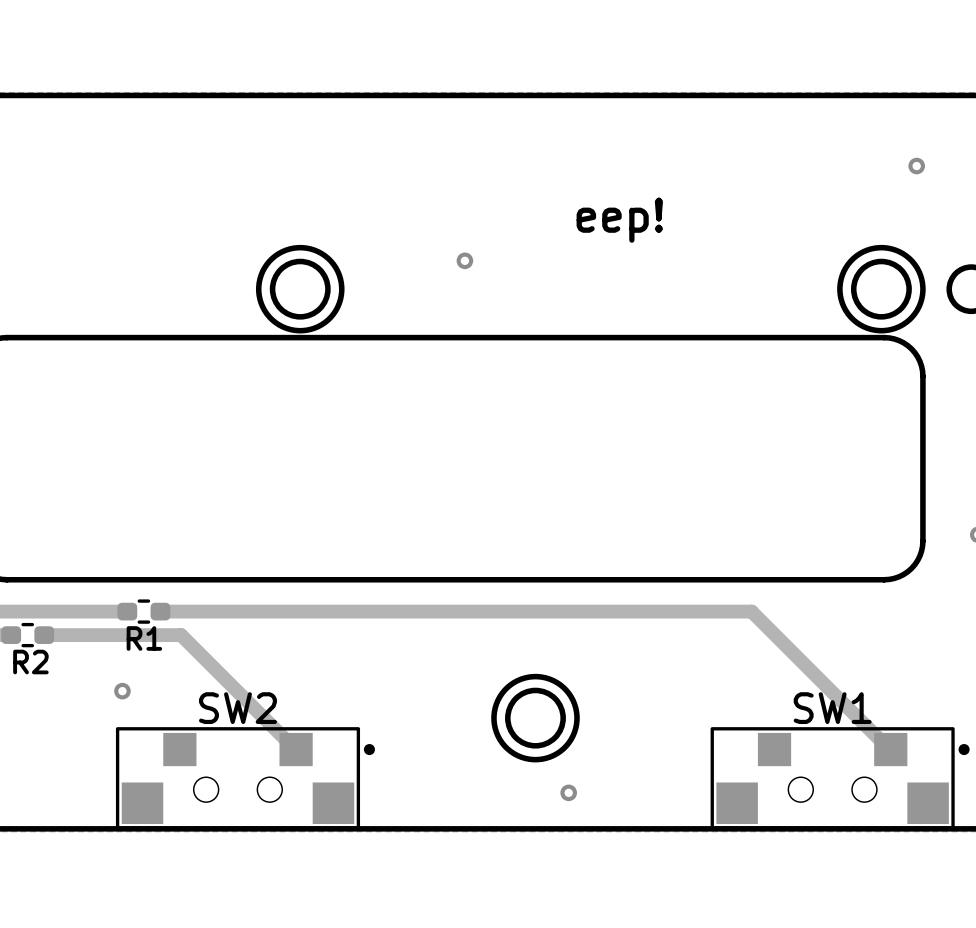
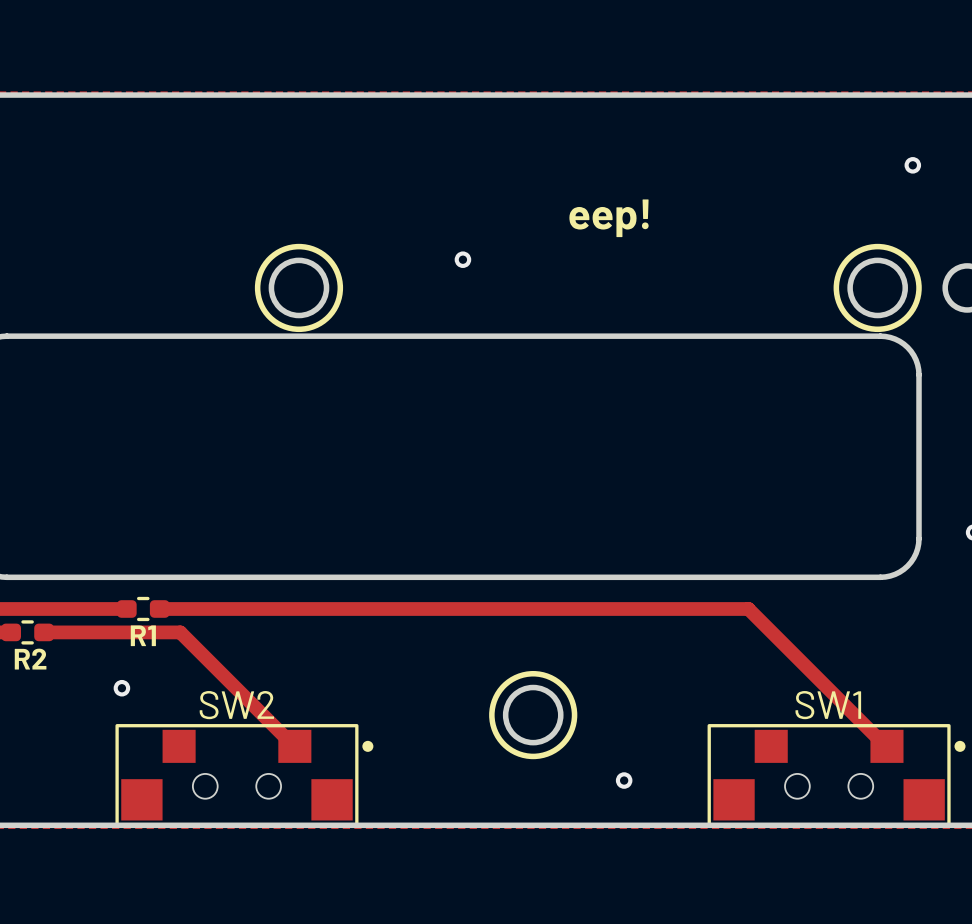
via position: (568, 792) -> (624, 780)

